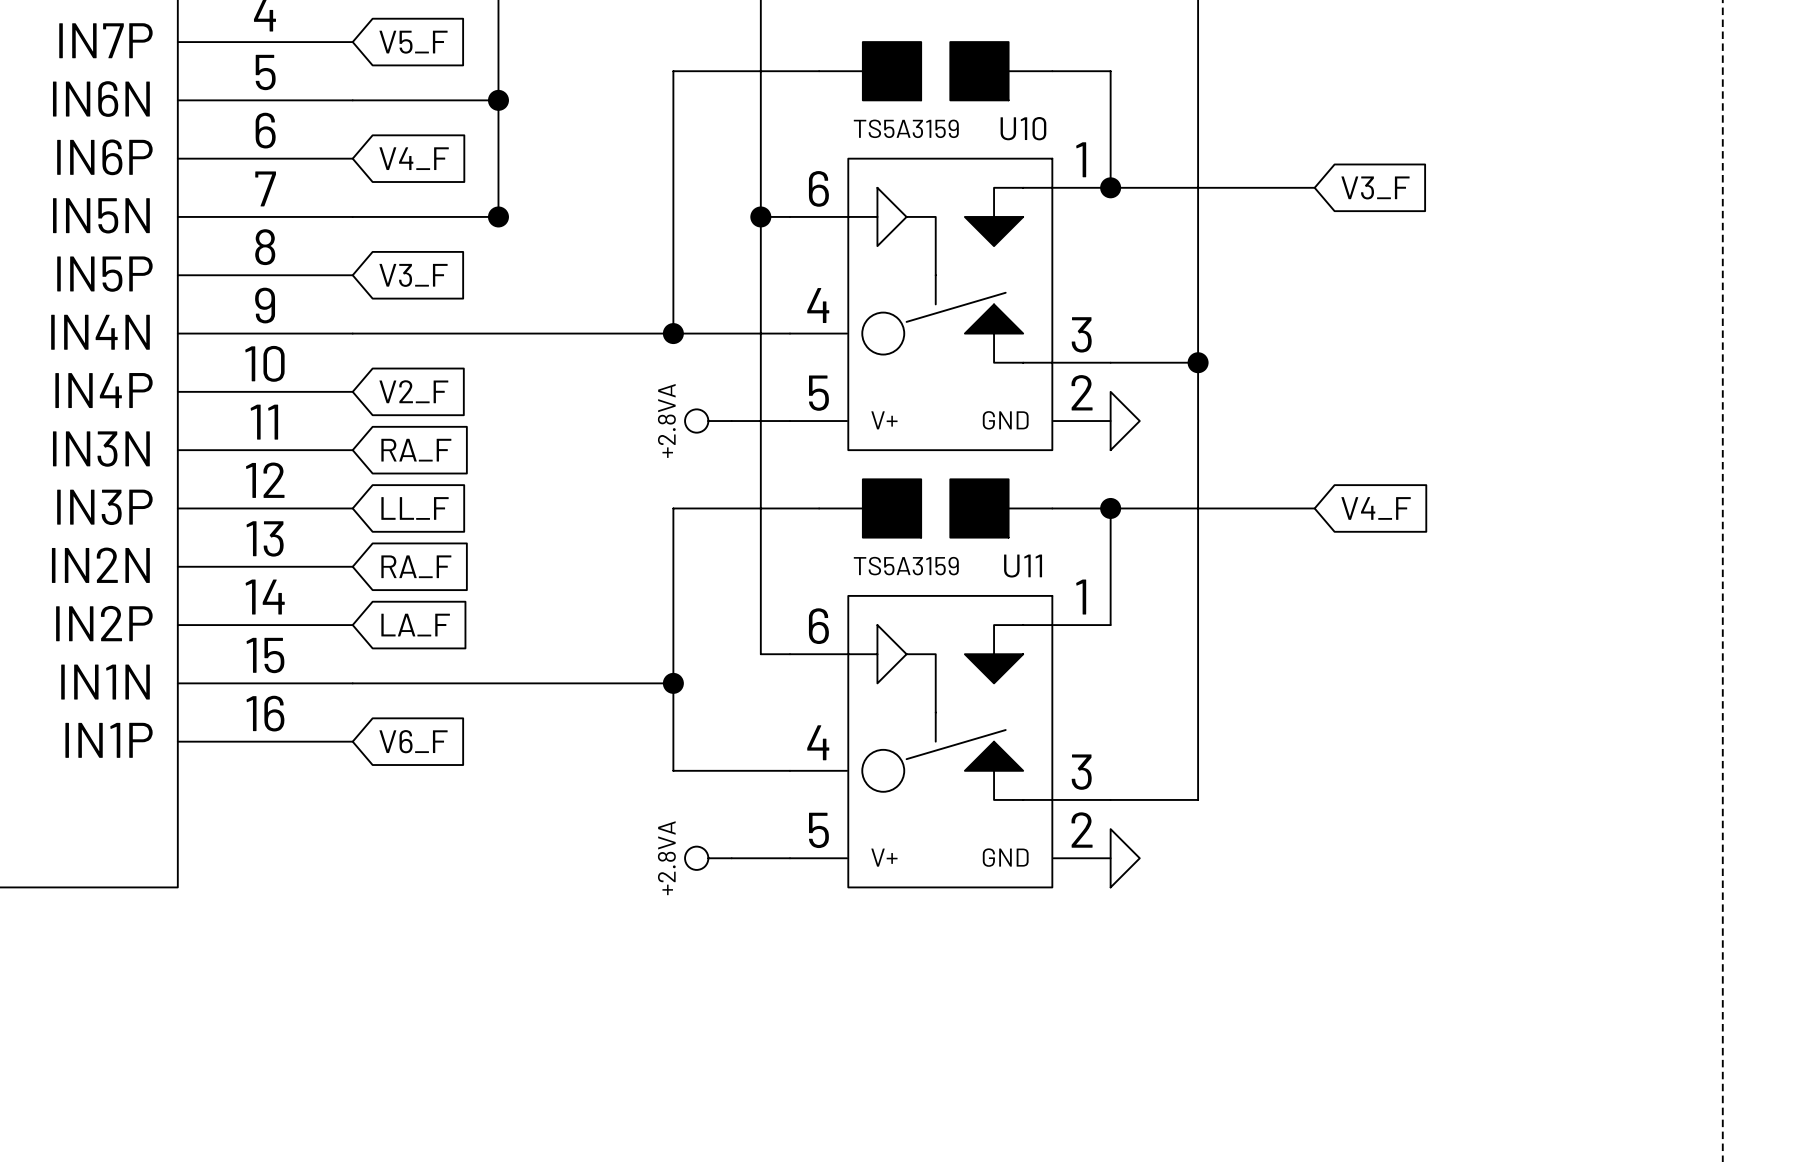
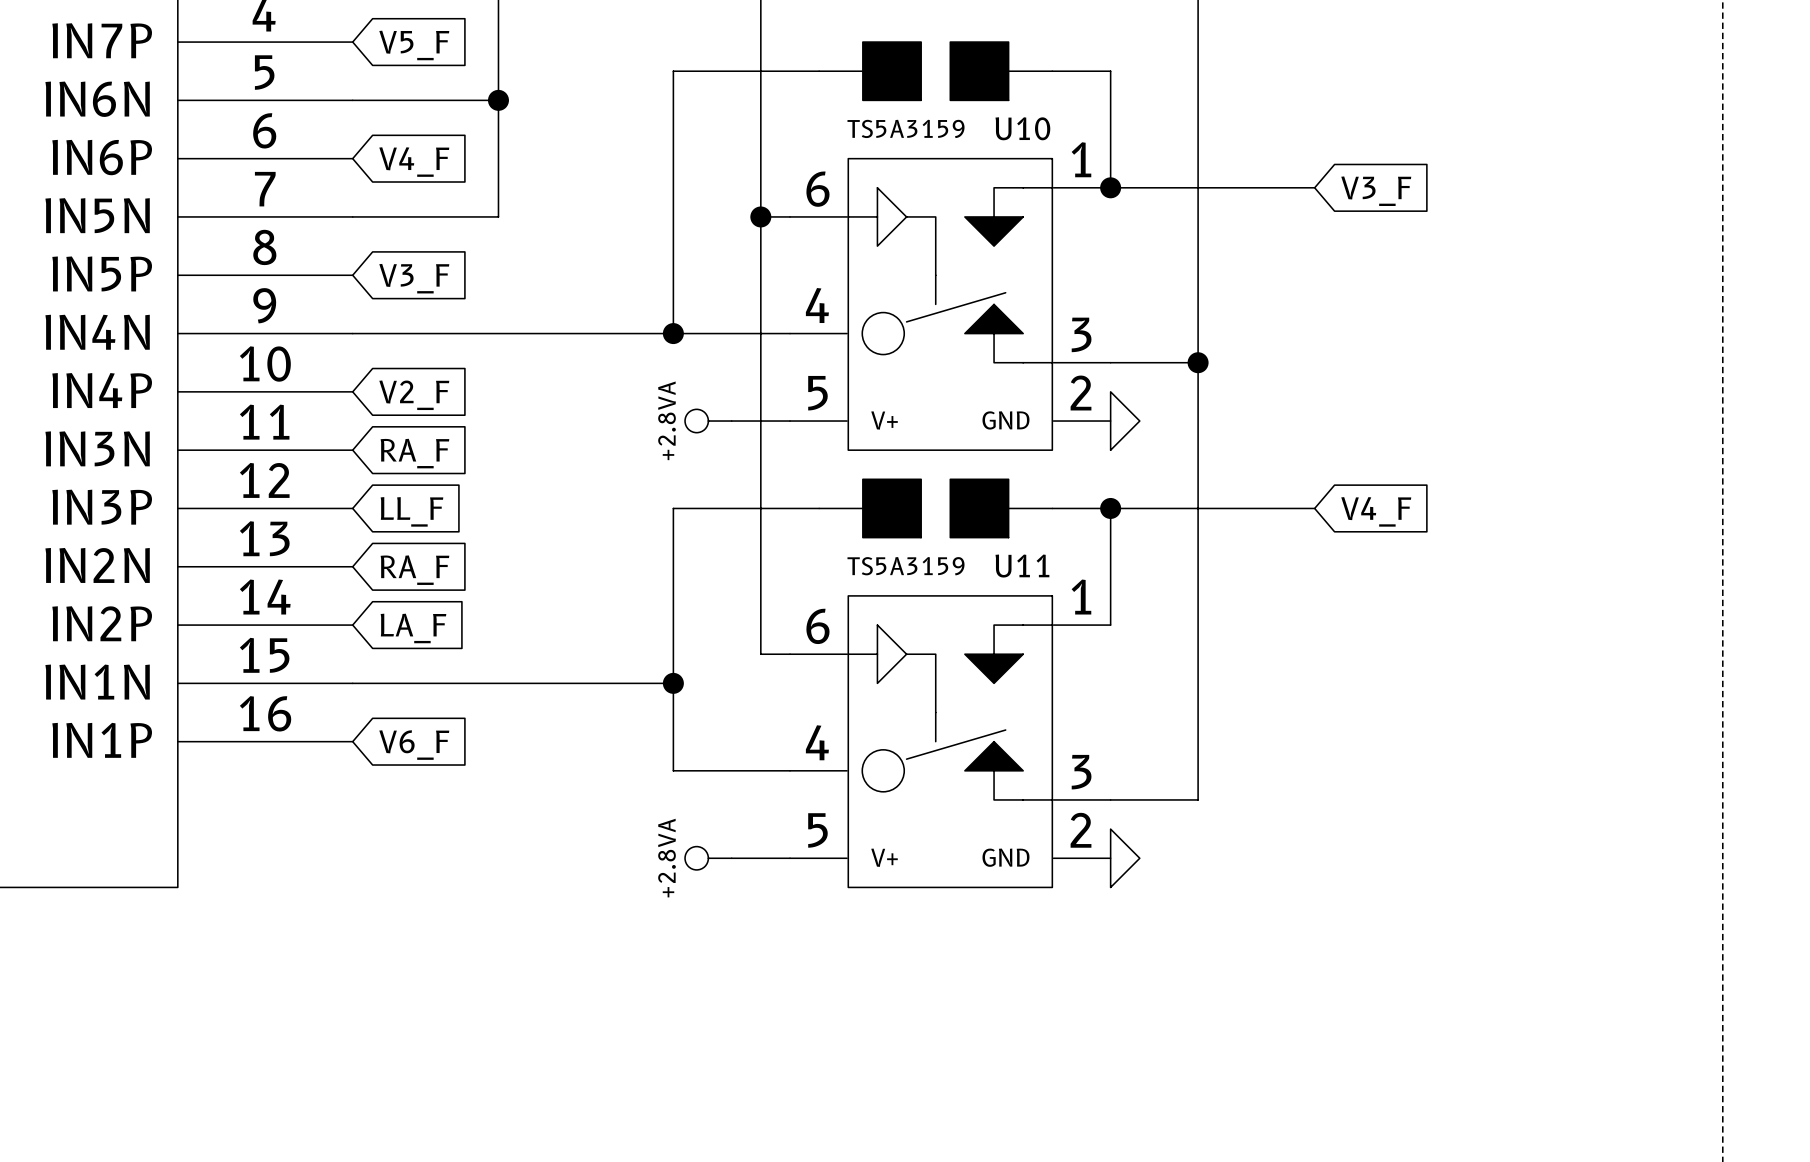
junction: (498, 216) -> none

